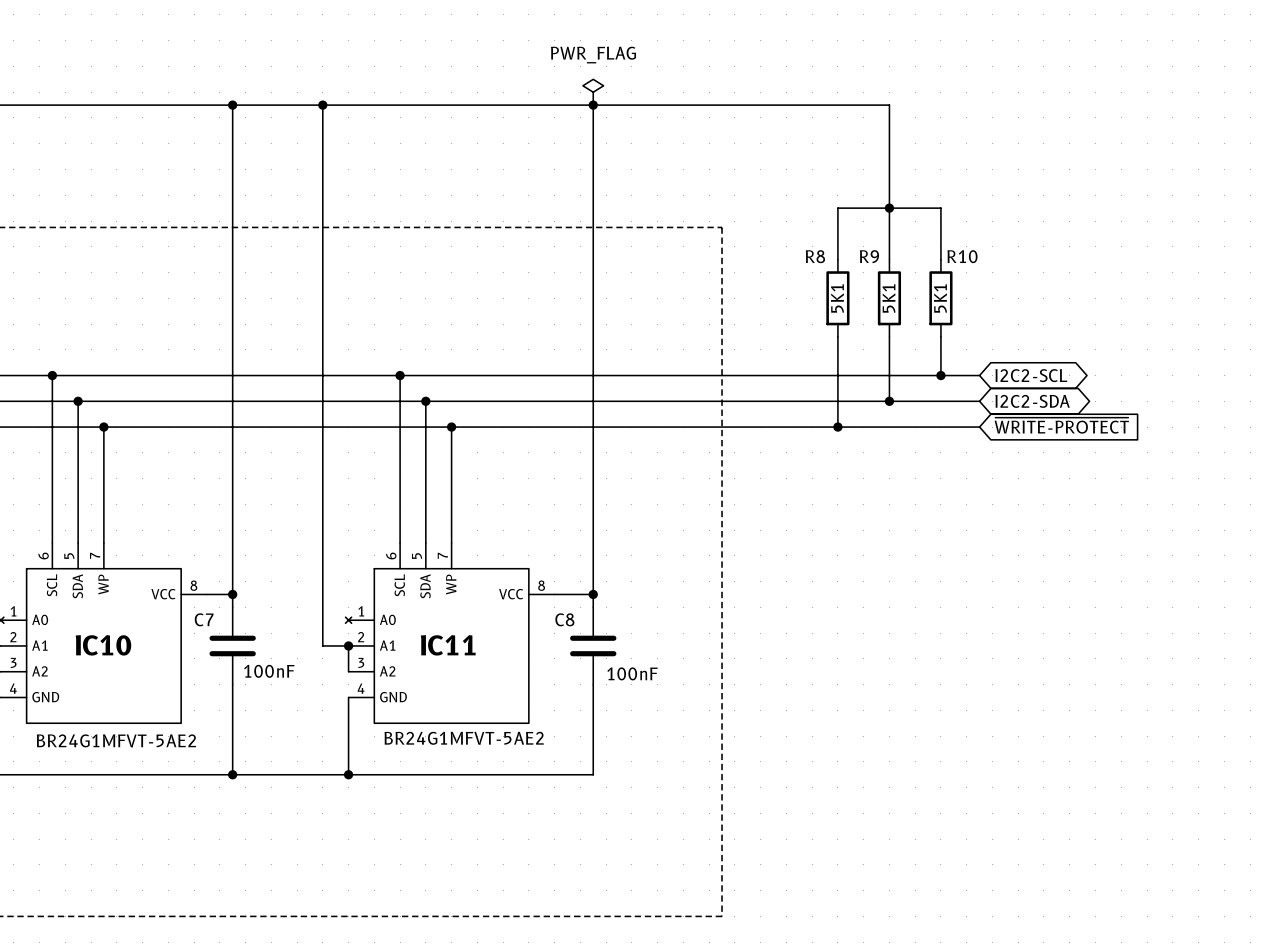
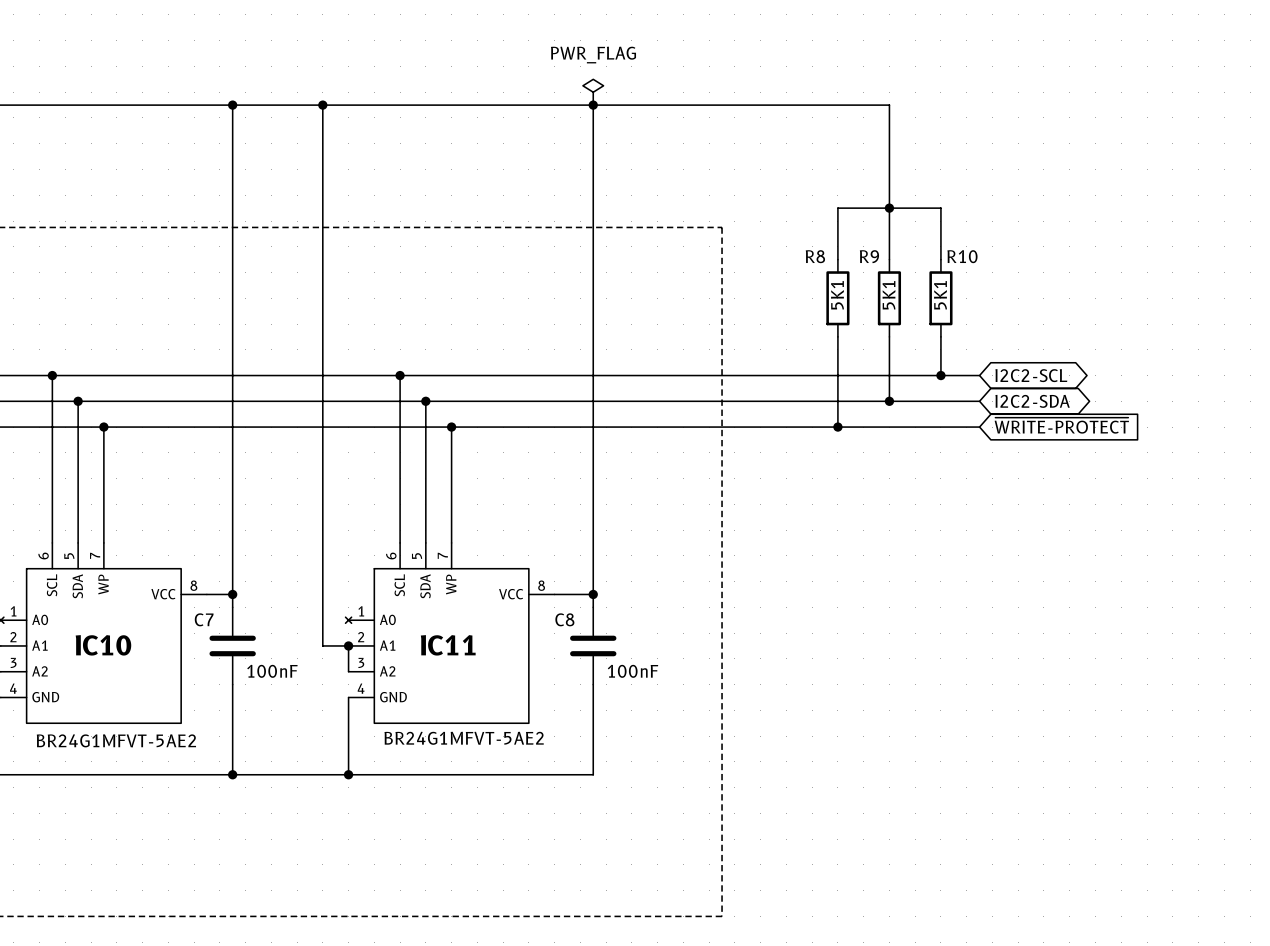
R8 value: none -> 5K1 (837, 295)
R9 value: none -> 5K1 (888, 295)
R10 value: none -> 5K1 (940, 295)
R8 text: 5K1 (837, 298) -> none
R9 text: 5K1 (888, 298) -> none
R10 text: 5K1 (940, 298) -> none
C7 text: 100nF (269, 671) -> none
C7 value: none -> 100nF (272, 671)
C8 value: none -> 100nF (632, 671)
C8 text: 100nF (632, 673) -> none

